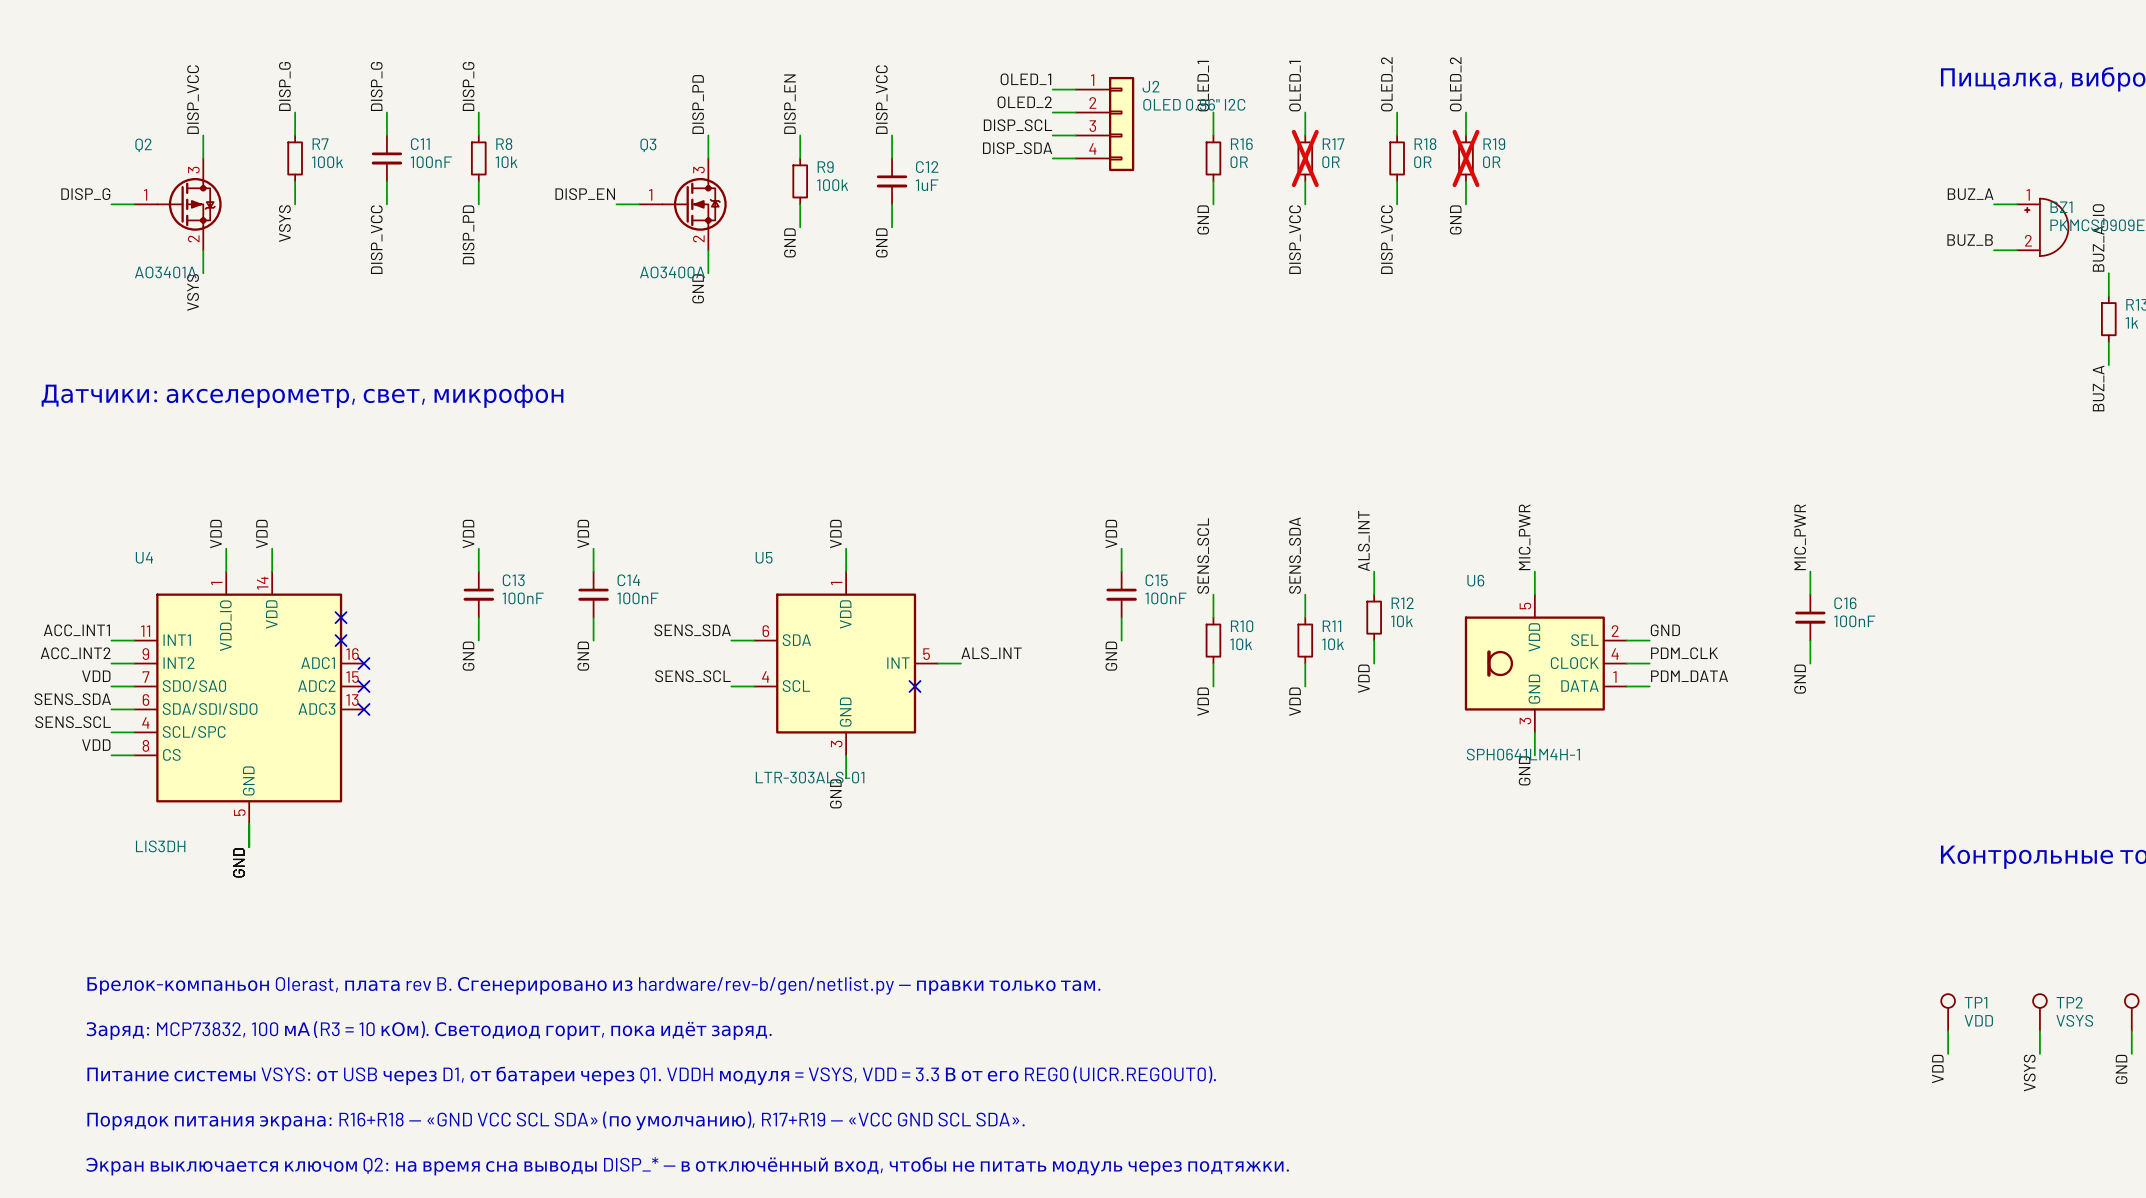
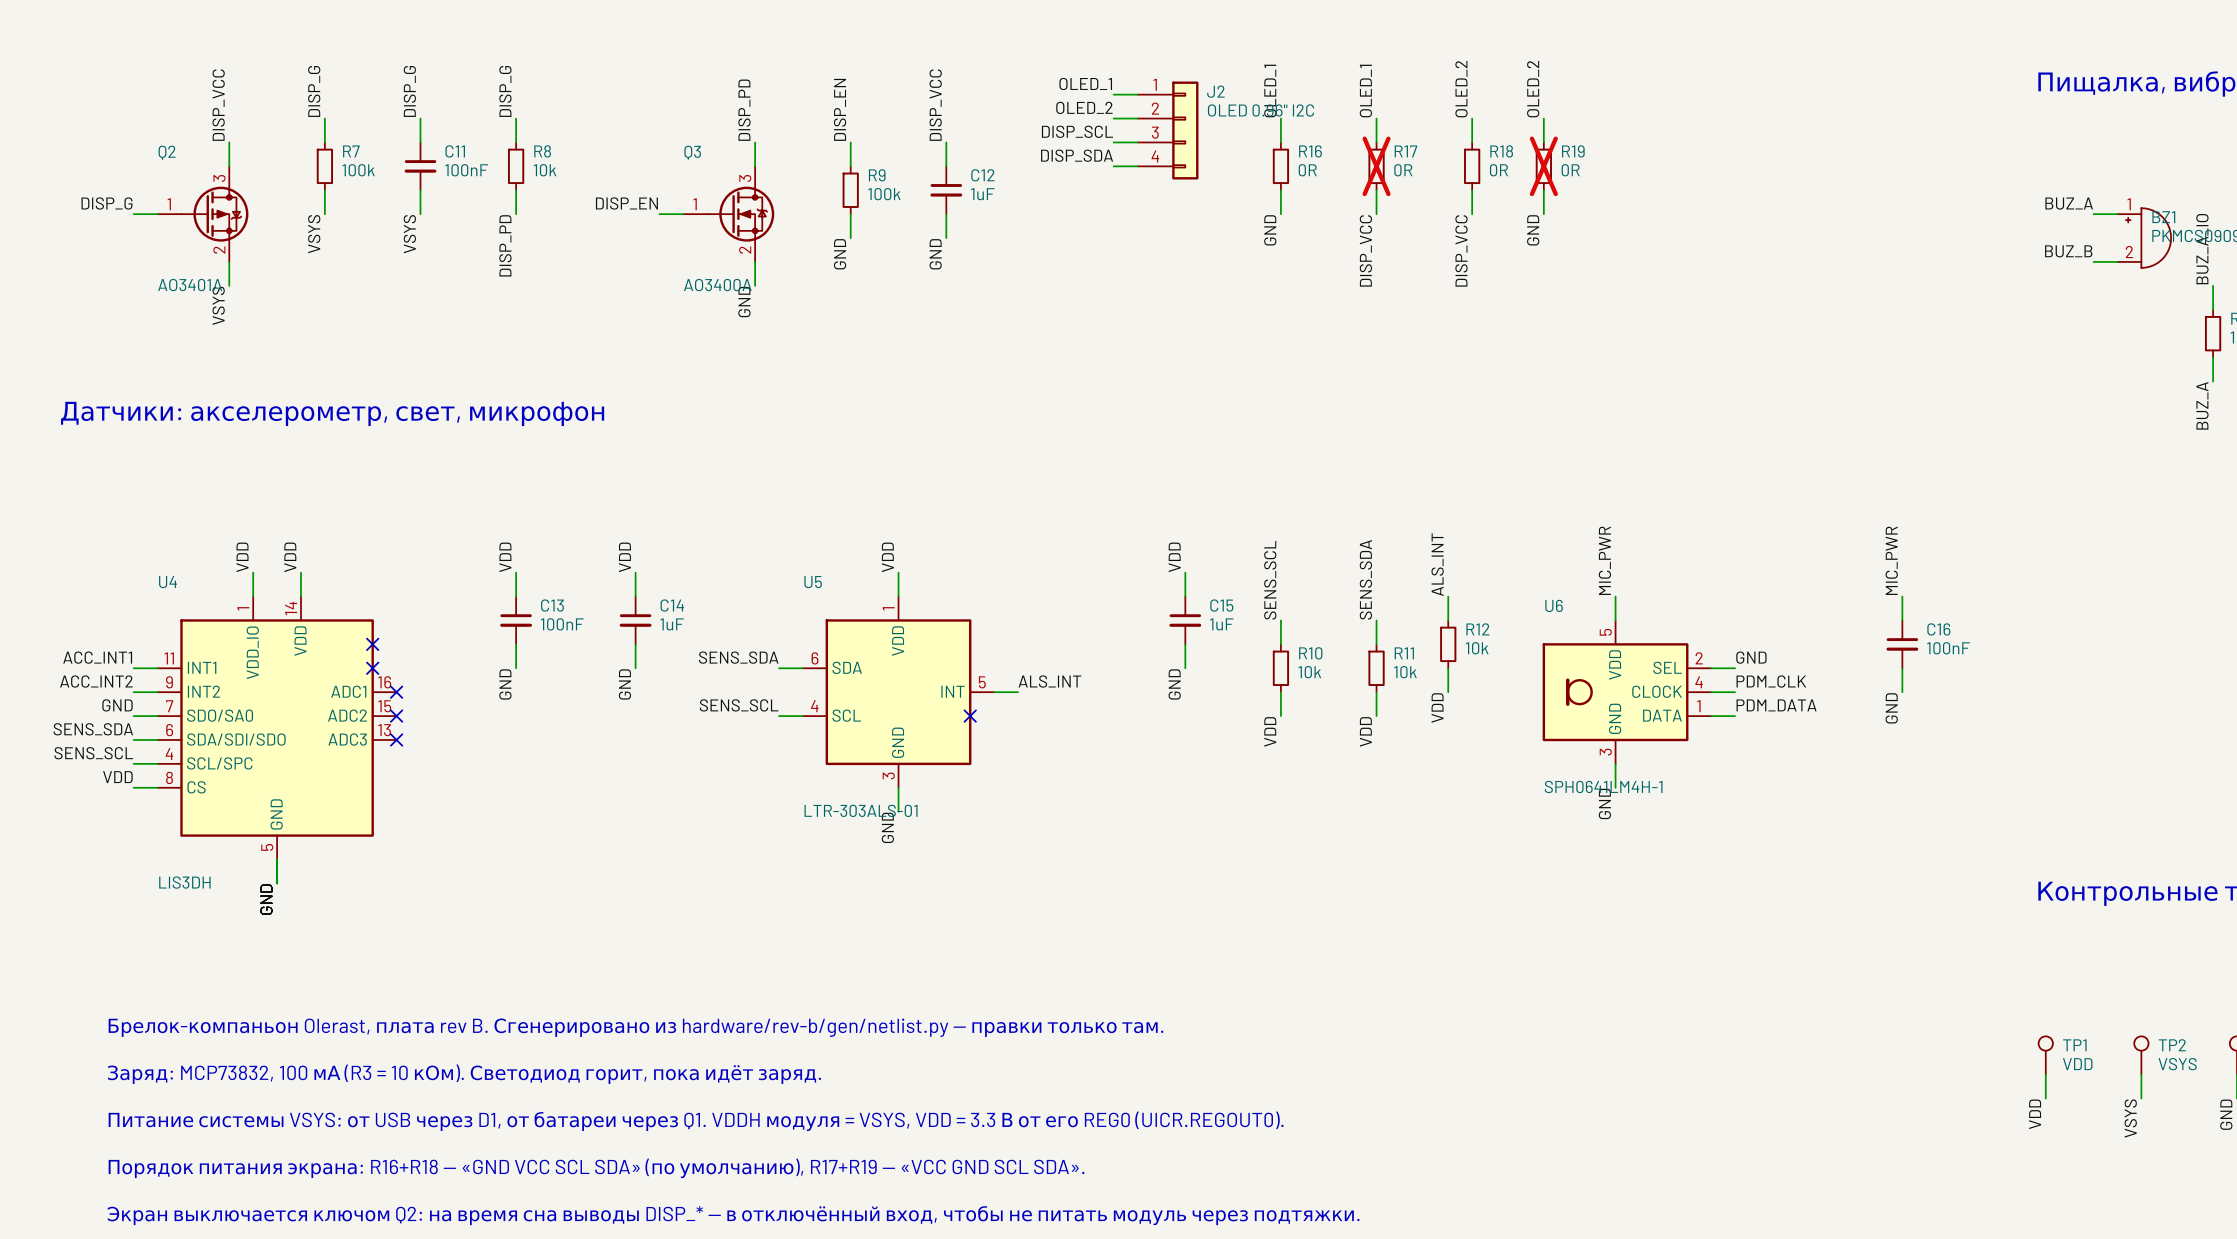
label: DISP_VCC (376, 239) -> VSYS (409, 234)
C14 value: 100nF (637, 598) -> 1uF (672, 624)
C15 value: 100nF (1165, 598) -> 1uF (1221, 624)
label: VDD (96, 676) -> GND (117, 705)

